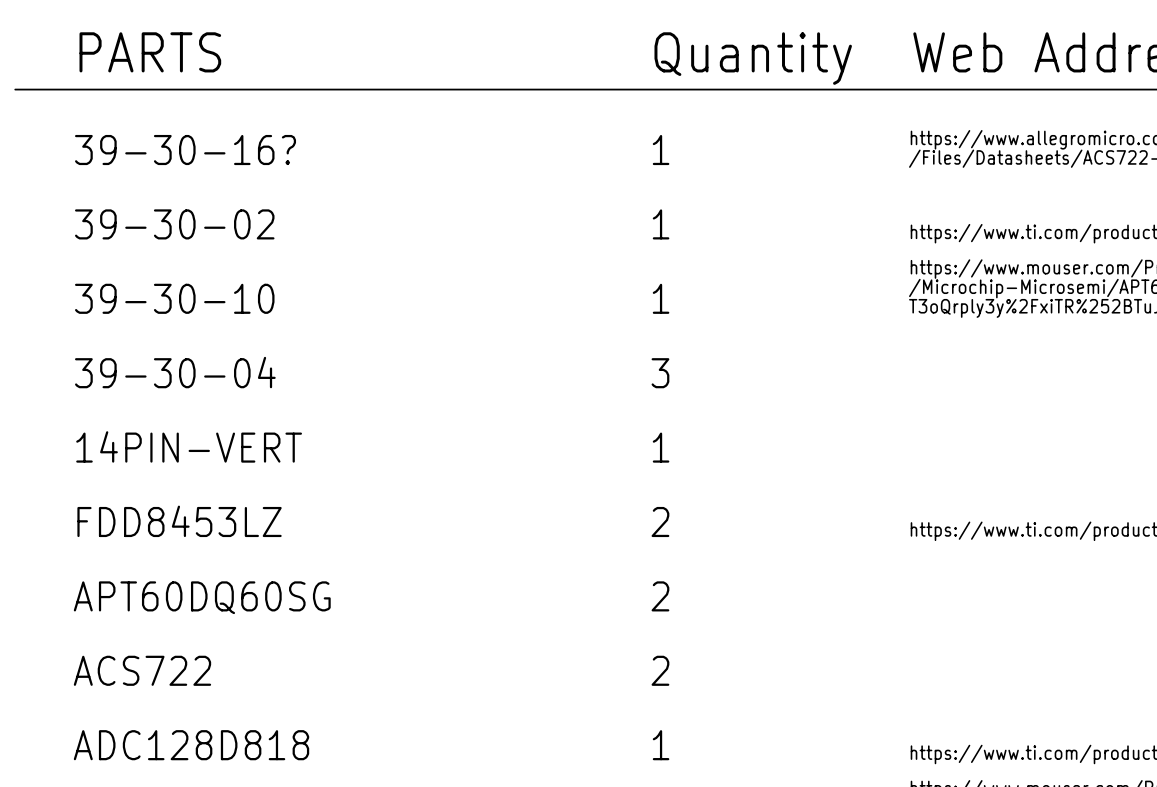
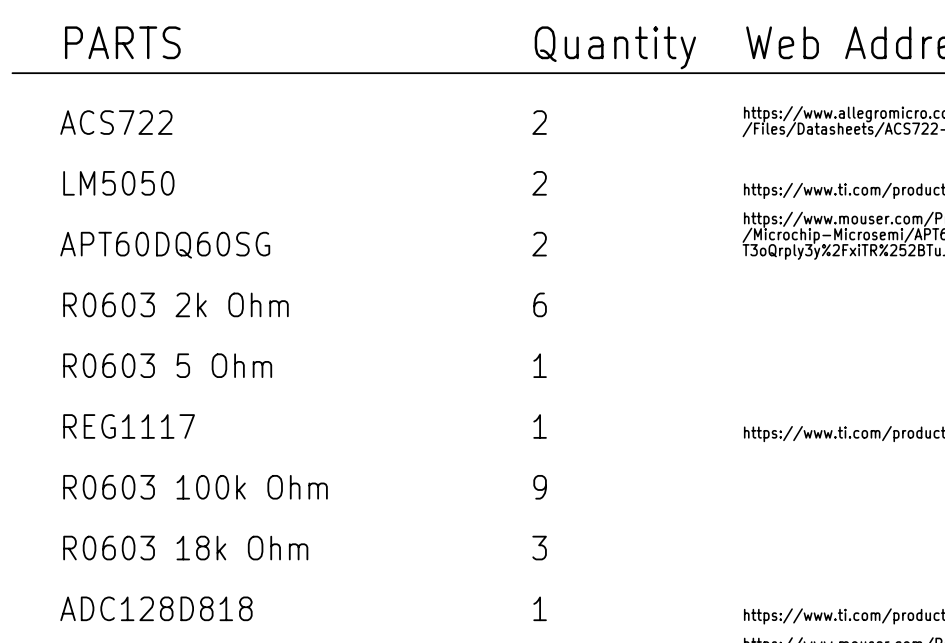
text: 39-30-16? (185, 150) -> ACS722 (116, 122)
text: 1 (661, 150) -> 2 (539, 122)
text: 39-30-02 (174, 224) -> LM5050 (118, 183)
text: 1 (661, 224) -> 2 (539, 183)
text: 39-30-10 (174, 298) -> APT60DQ60SG (165, 245)
text: 1 (661, 298) -> 2 (539, 244)
text: 39-30-04 (175, 372) -> R0603 2k Ohm (175, 304)
text: 3 (660, 373) -> 6 (540, 304)
text: 14PIN-VERT (189, 446) -> R0603 5 Ohm (167, 365)
text: FDD8453LZ (179, 521) -> REG1117 (129, 426)
text: 2 (660, 522) -> 1 (540, 426)
text: 2 (660, 596) -> 9 (540, 487)
text: APT60DQ60SG (202, 597) -> R0603 100k Ohm (195, 487)
text: ACS722 (142, 670) -> R0603 18k Ohm (185, 548)
text: 2 (660, 670) -> 3 (539, 548)

